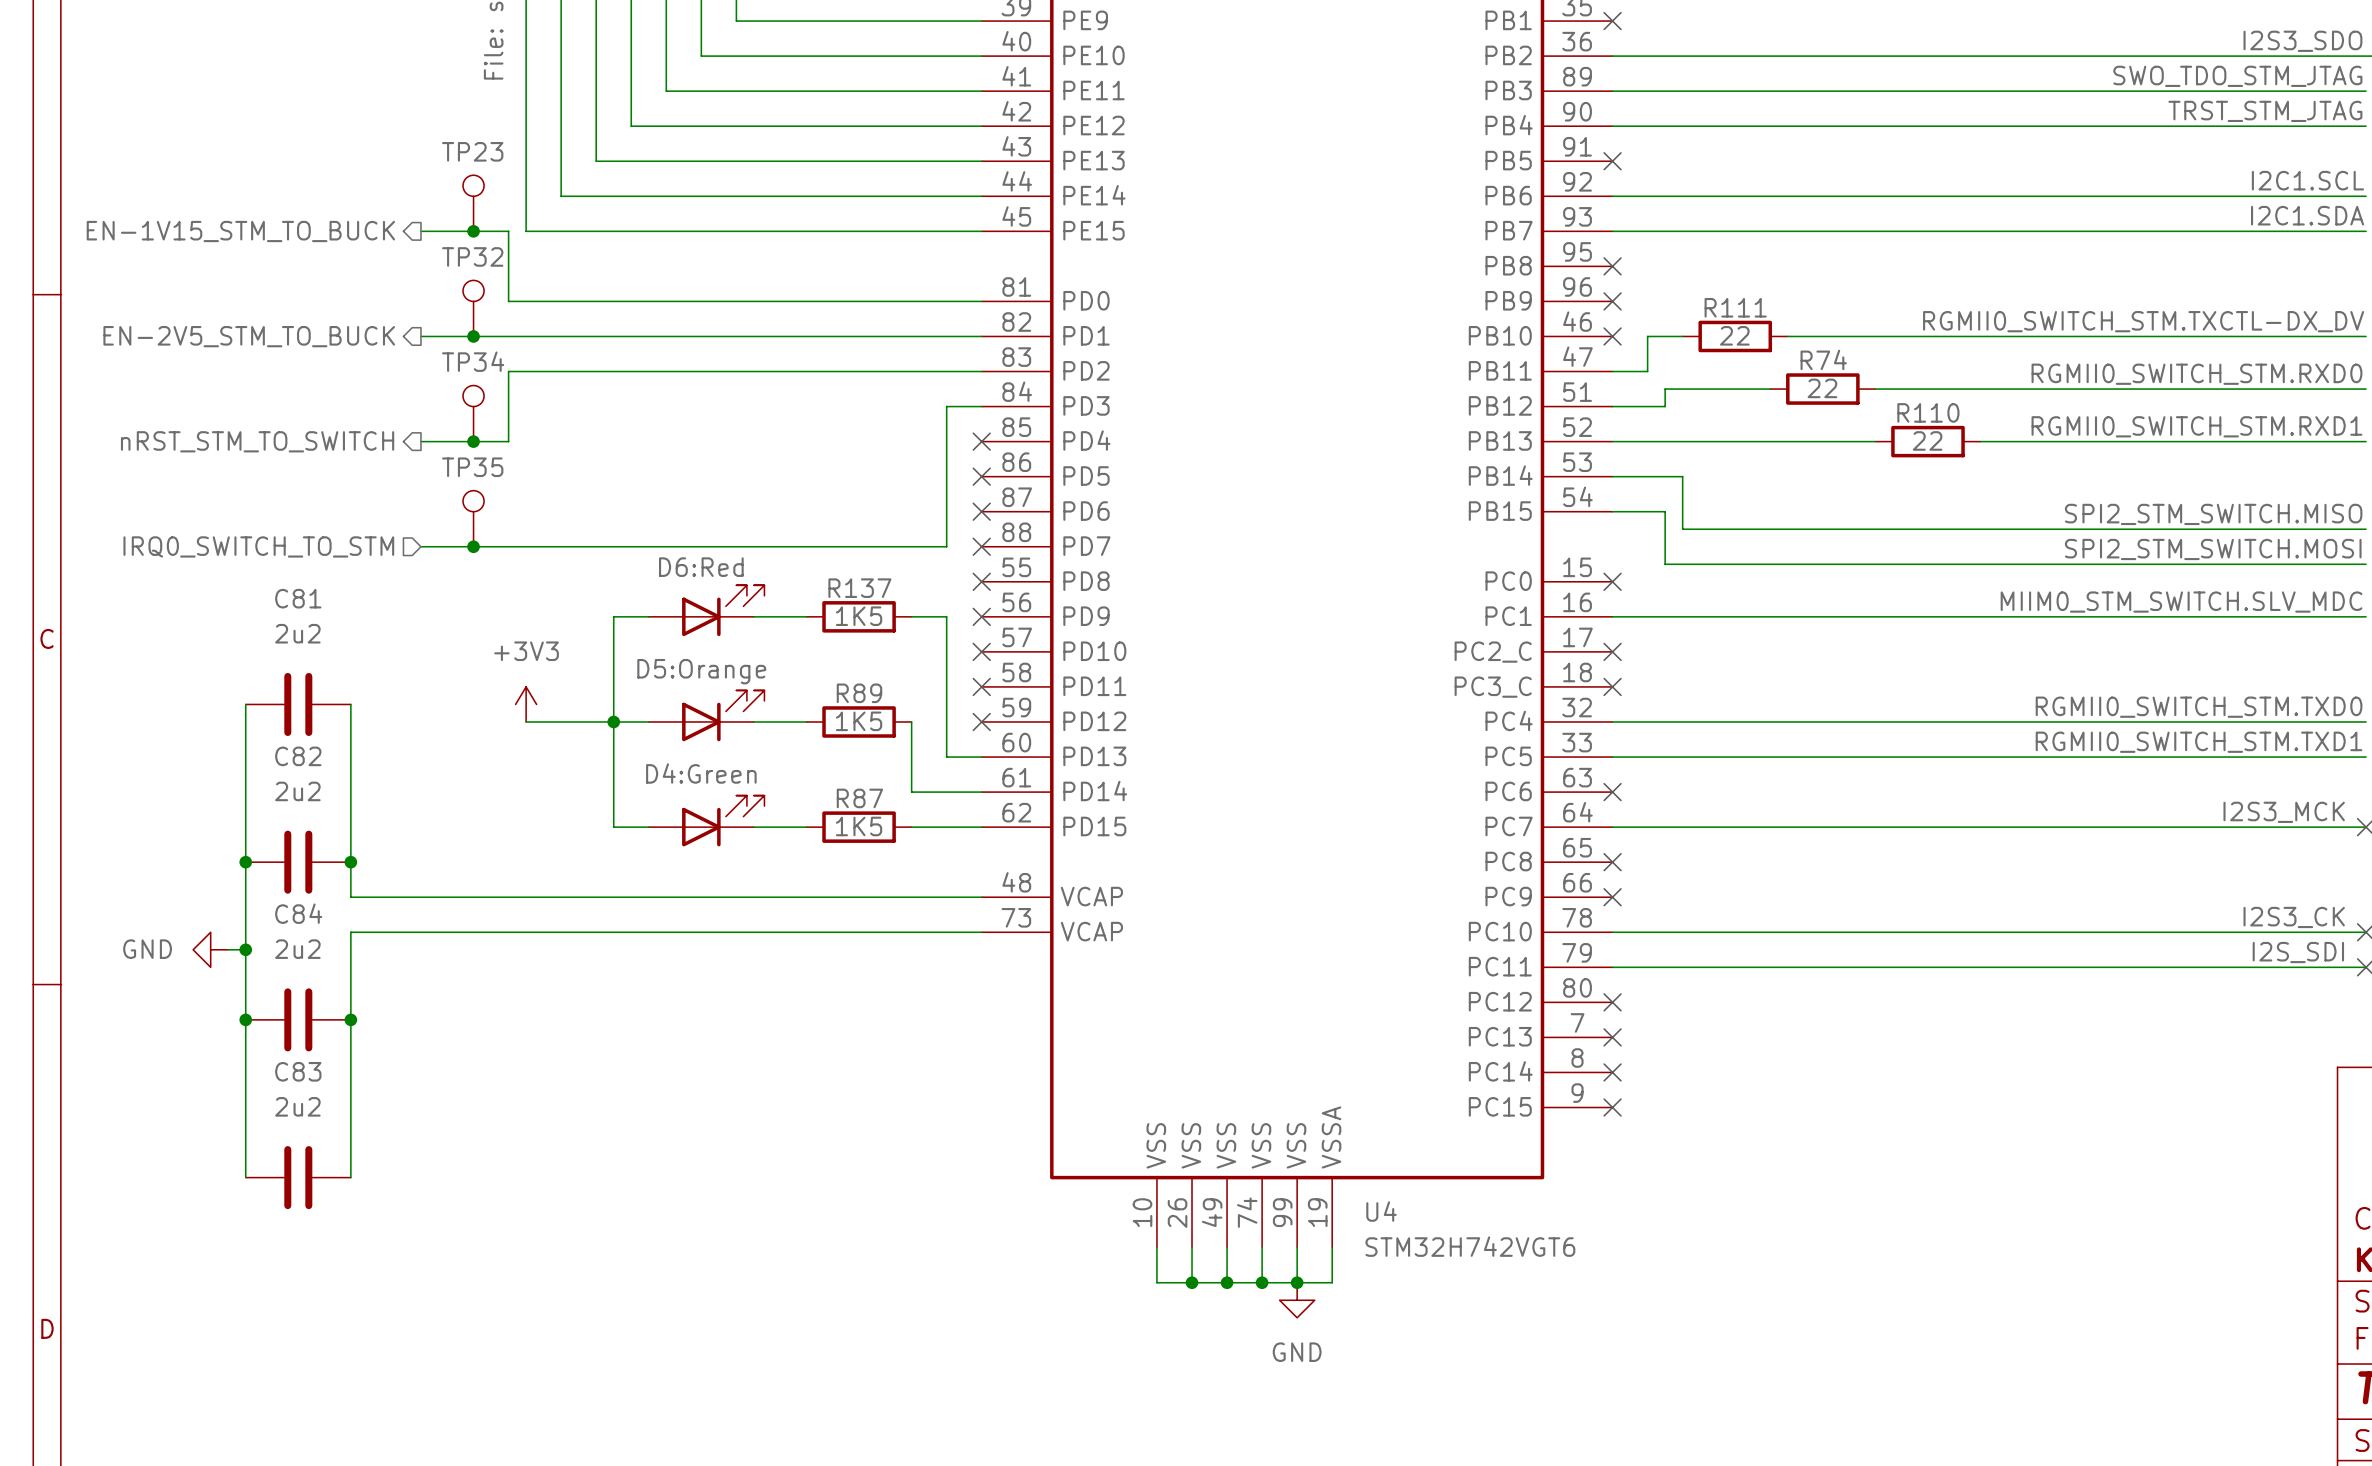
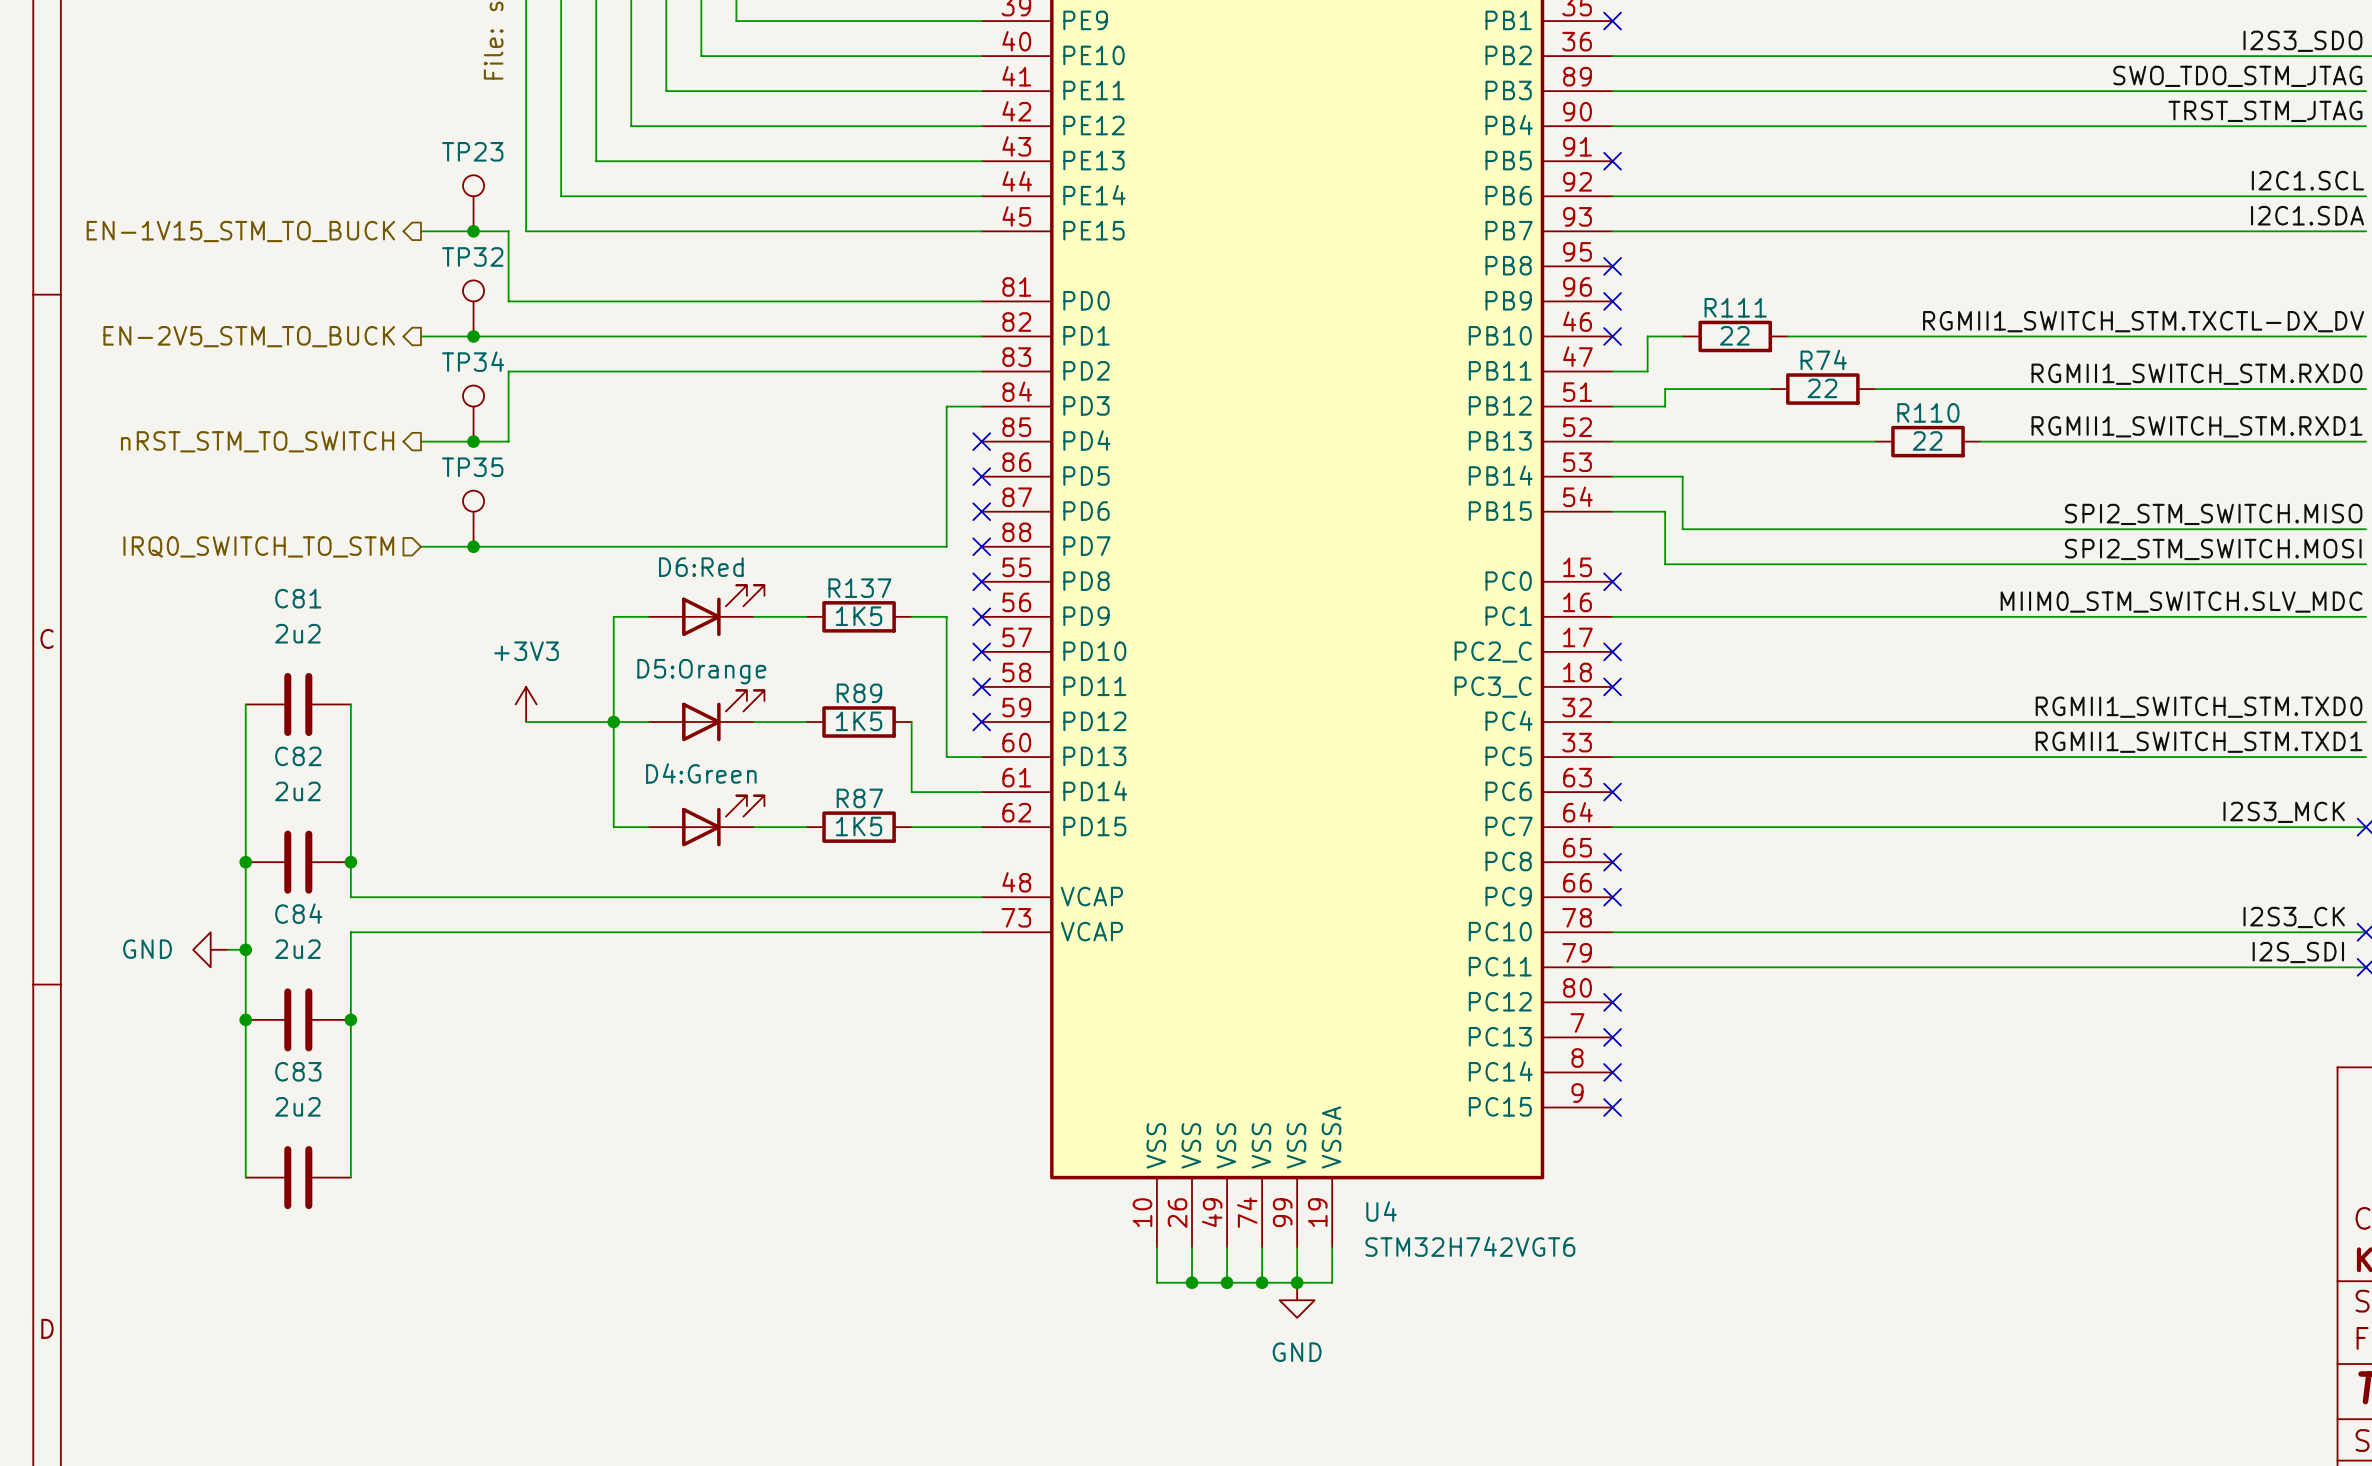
label: RGMII0_SWITCH_STM.TXCTL-DX_DV (2143, 321) -> RGMII1_SWITCH_STM.TXCTL-DX_DV (2143, 321)
label: RGMII0_SWITCH_STM.RXD0 (2196, 374) -> RGMII1_SWITCH_STM.RXD0 (2196, 374)
label: RGMII0_SWITCH_STM.RXD1 (2196, 426) -> RGMII1_SWITCH_STM.RXD1 (2196, 426)
label: RGMII0_SWITCH_STM.TXD0 (2199, 707) -> RGMII1_SWITCH_STM.TXD0 (2199, 707)
label: RGMII0_SWITCH_STM.TXD1 (2199, 742) -> RGMII1_SWITCH_STM.TXD1 (2199, 742)

